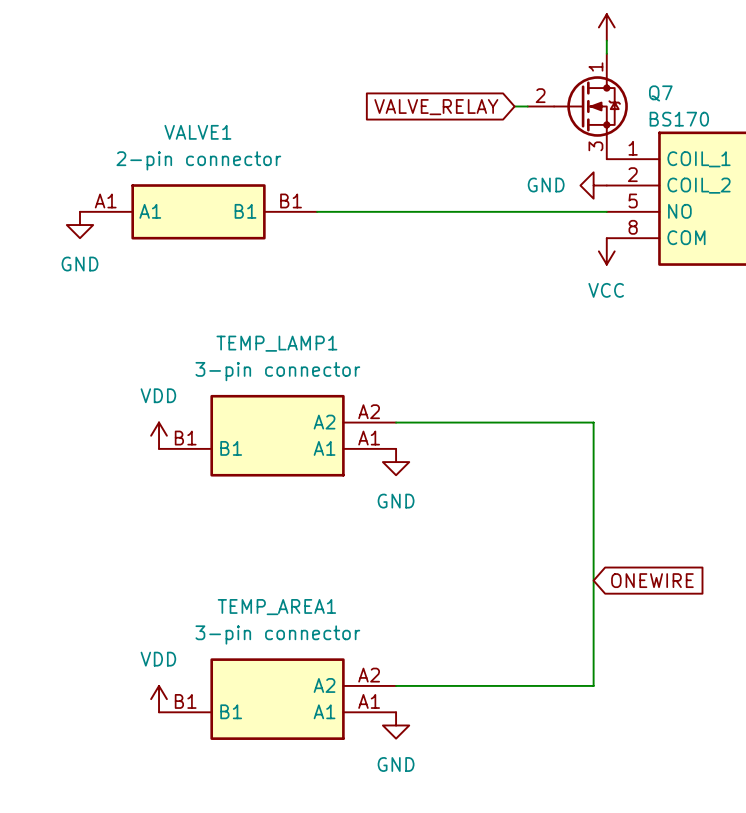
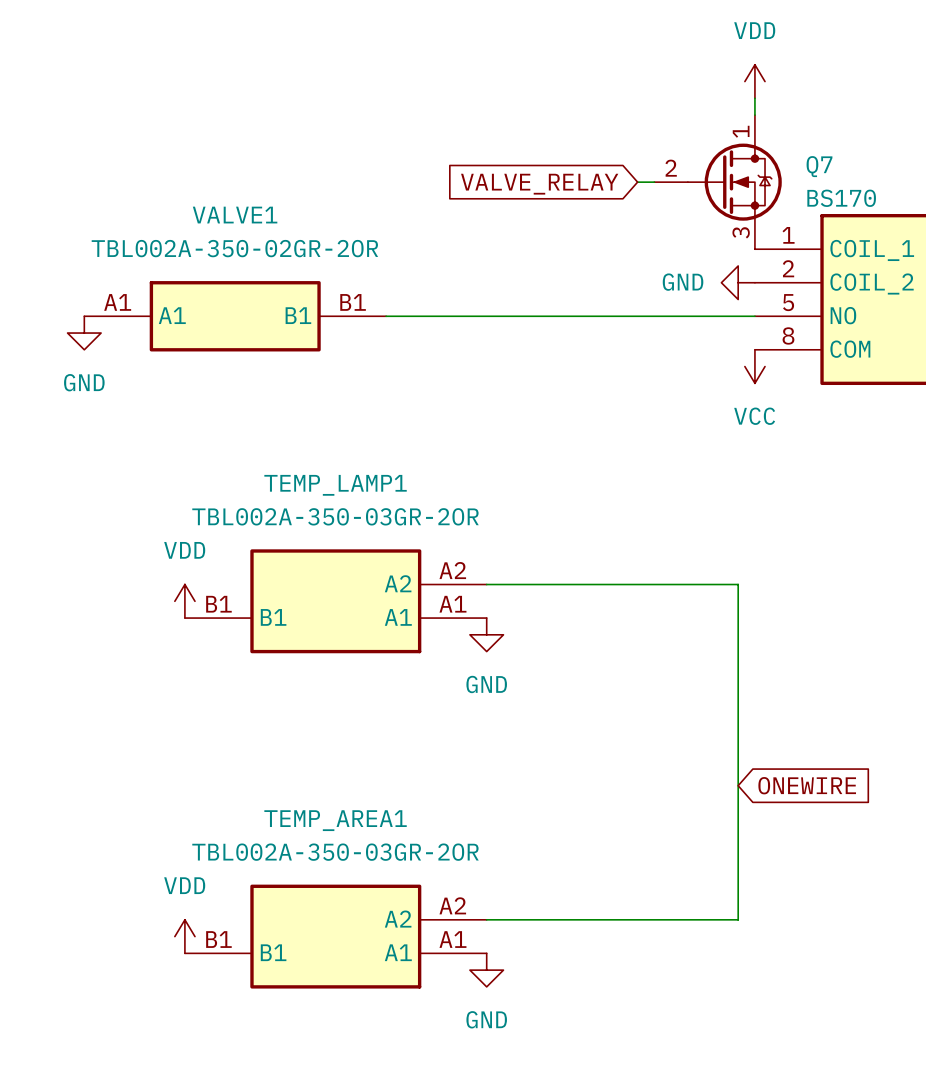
VALVE1 value: 2-pin connector (198, 160) -> TBL002A-350-02GR-2OR (234, 248)
TEMP_LAMP1 value: 3-pin connector (277, 371) -> TBL002A-350-03GR-2OR (335, 516)
TEMP_AREA1 value: 3-pin connector (277, 634) -> TBL002A-350-03GR-2OR (335, 852)

